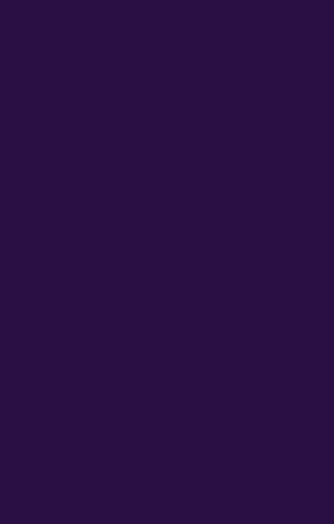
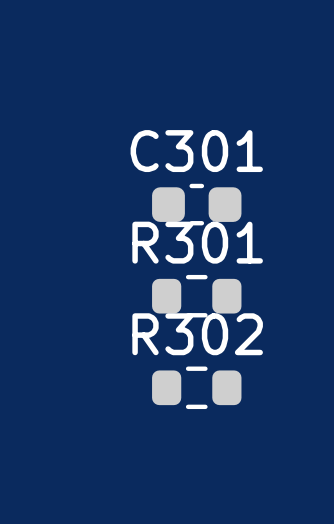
C301: none -> (196, 204)
R301: none -> (196, 296)
R302: none -> (196, 387)

